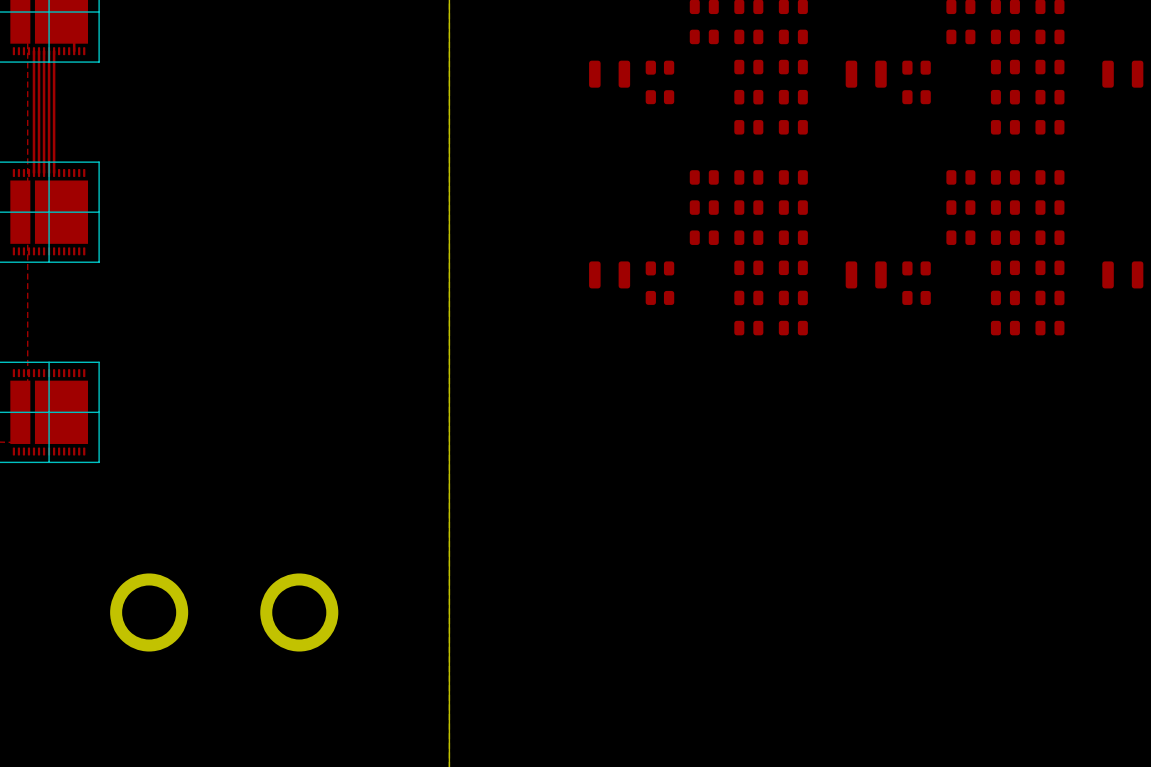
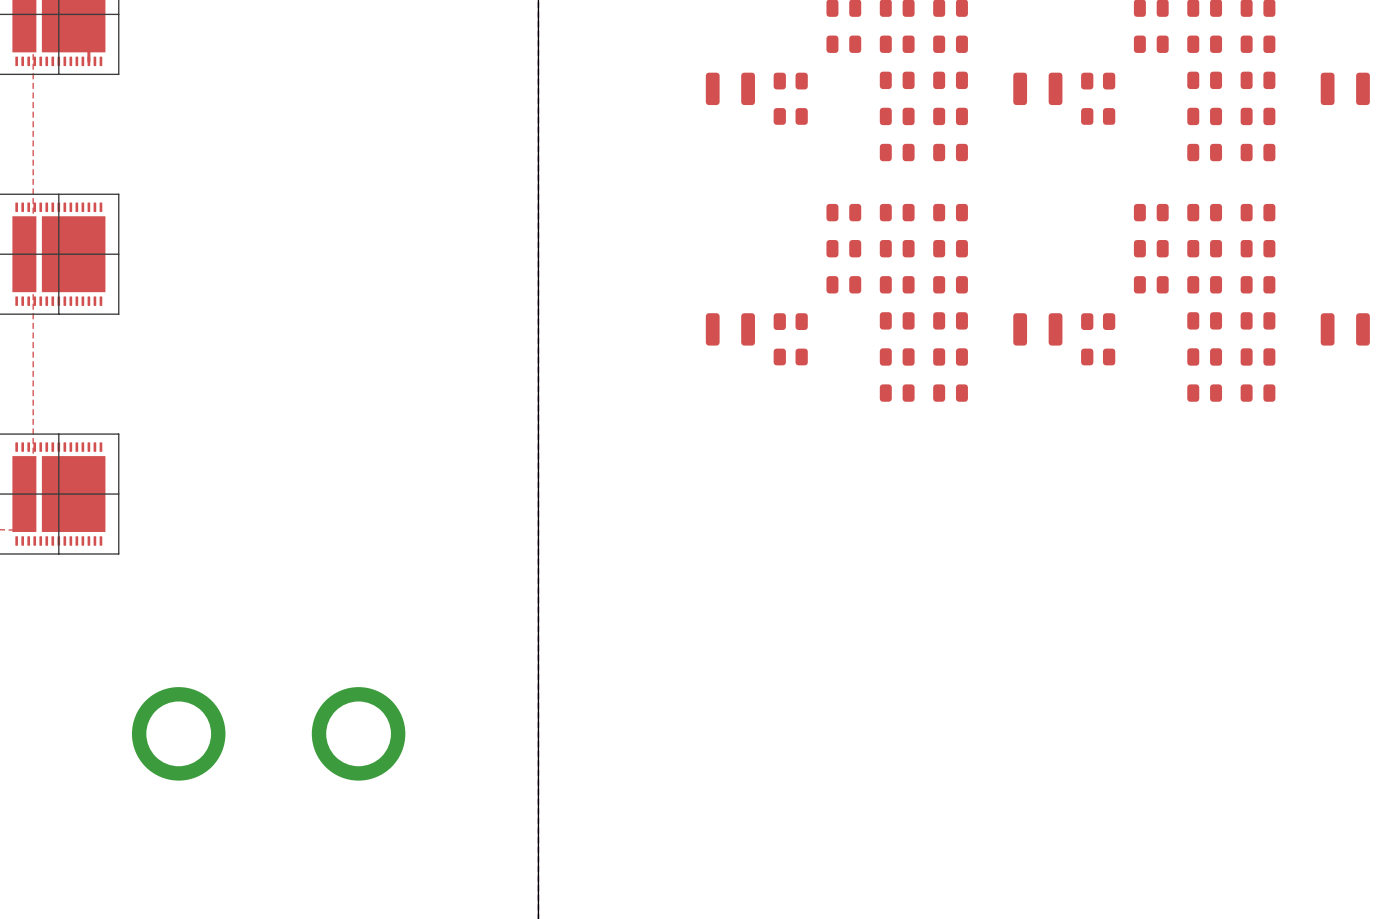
top track: (34, 51) (34, 172) -> none
top track: (39, 51) (39, 172) -> none
top track: (44, 51) (44, 172) -> none
top track: (49, 51) (49, 172) -> none
top track: (54, 51) (54, 172) -> none

